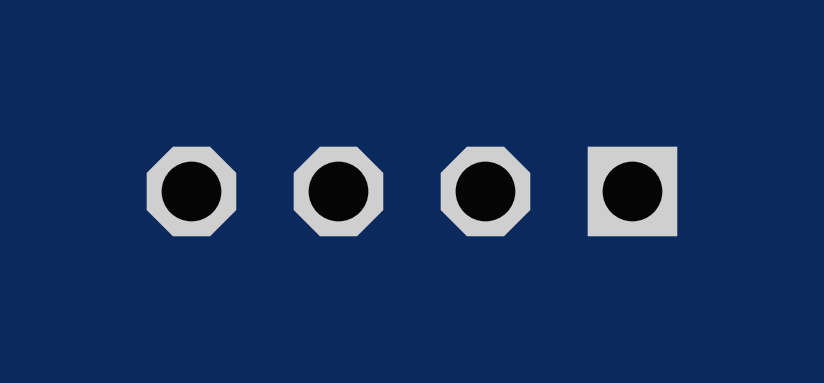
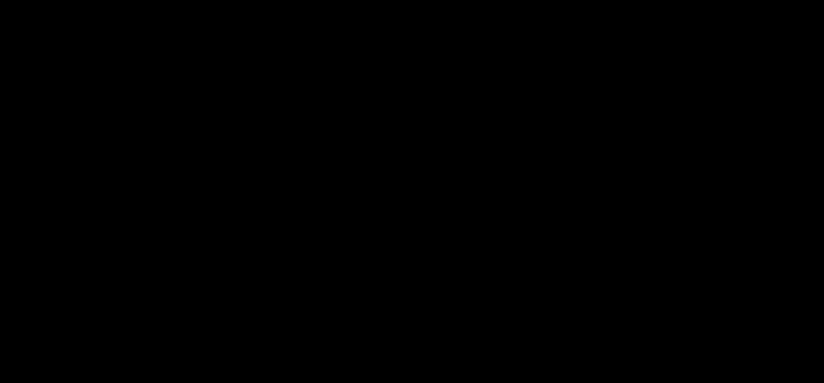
part: (411, 191) -> none

